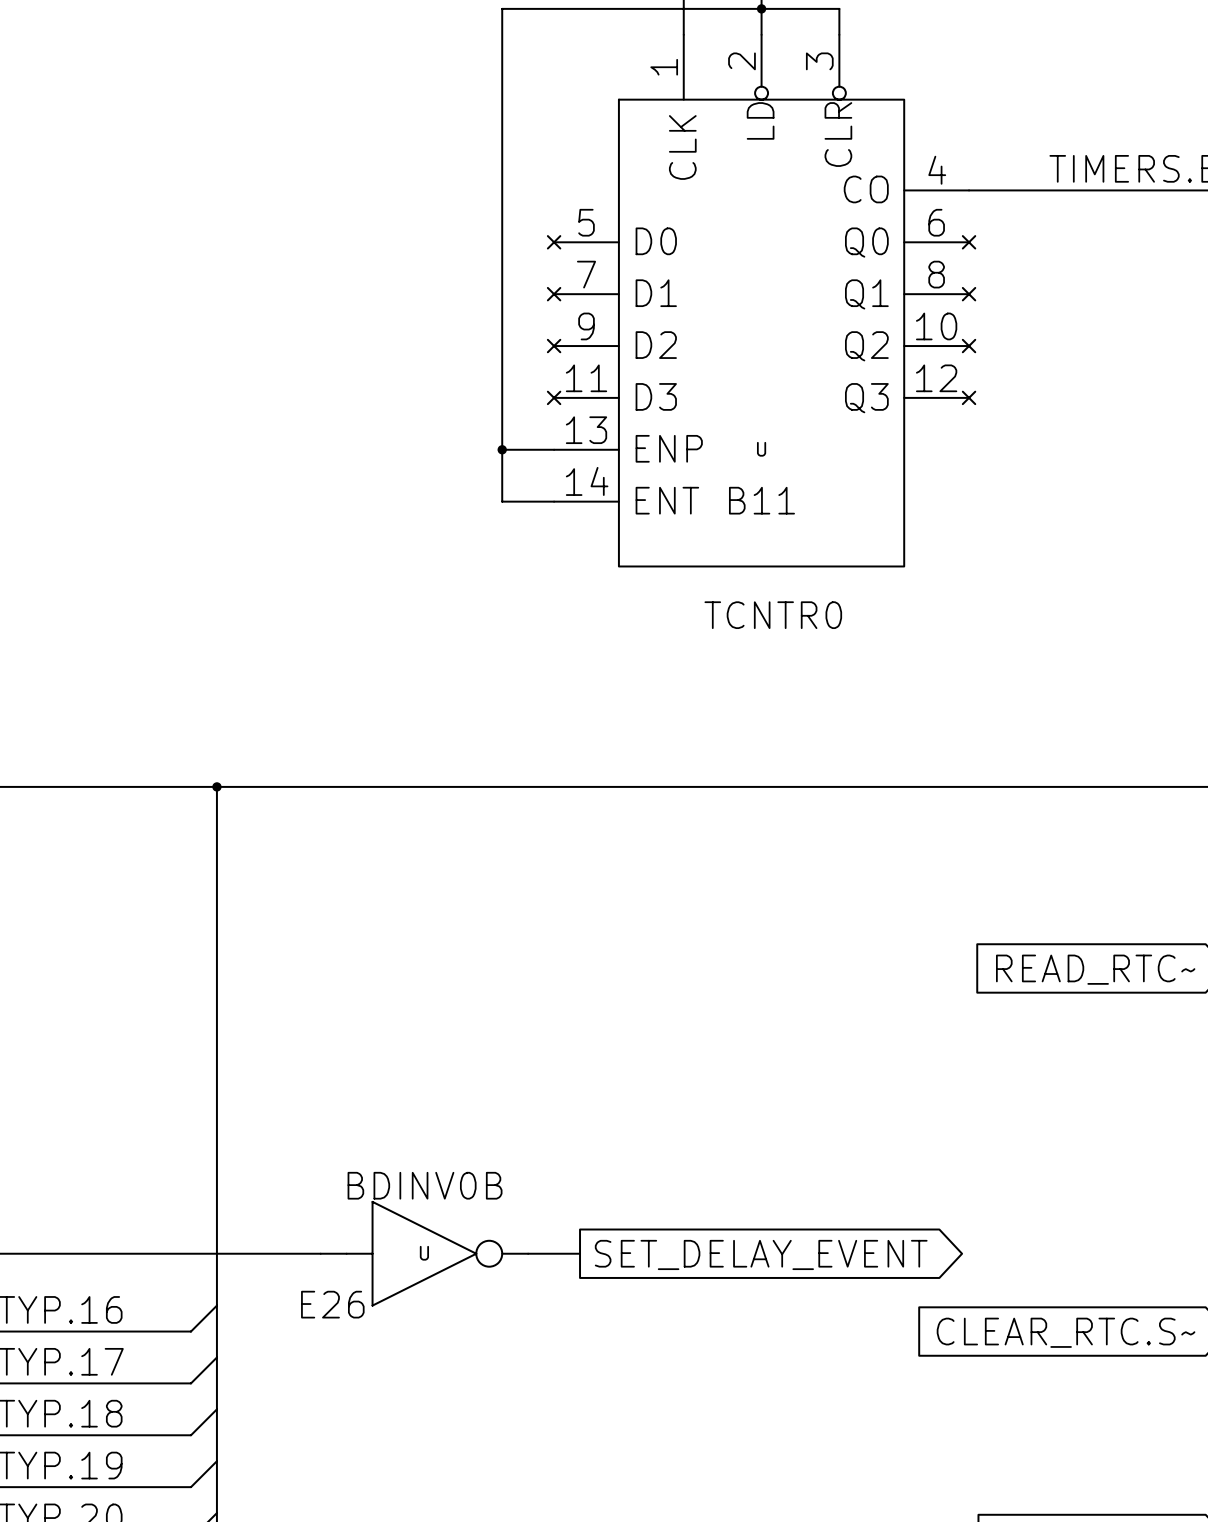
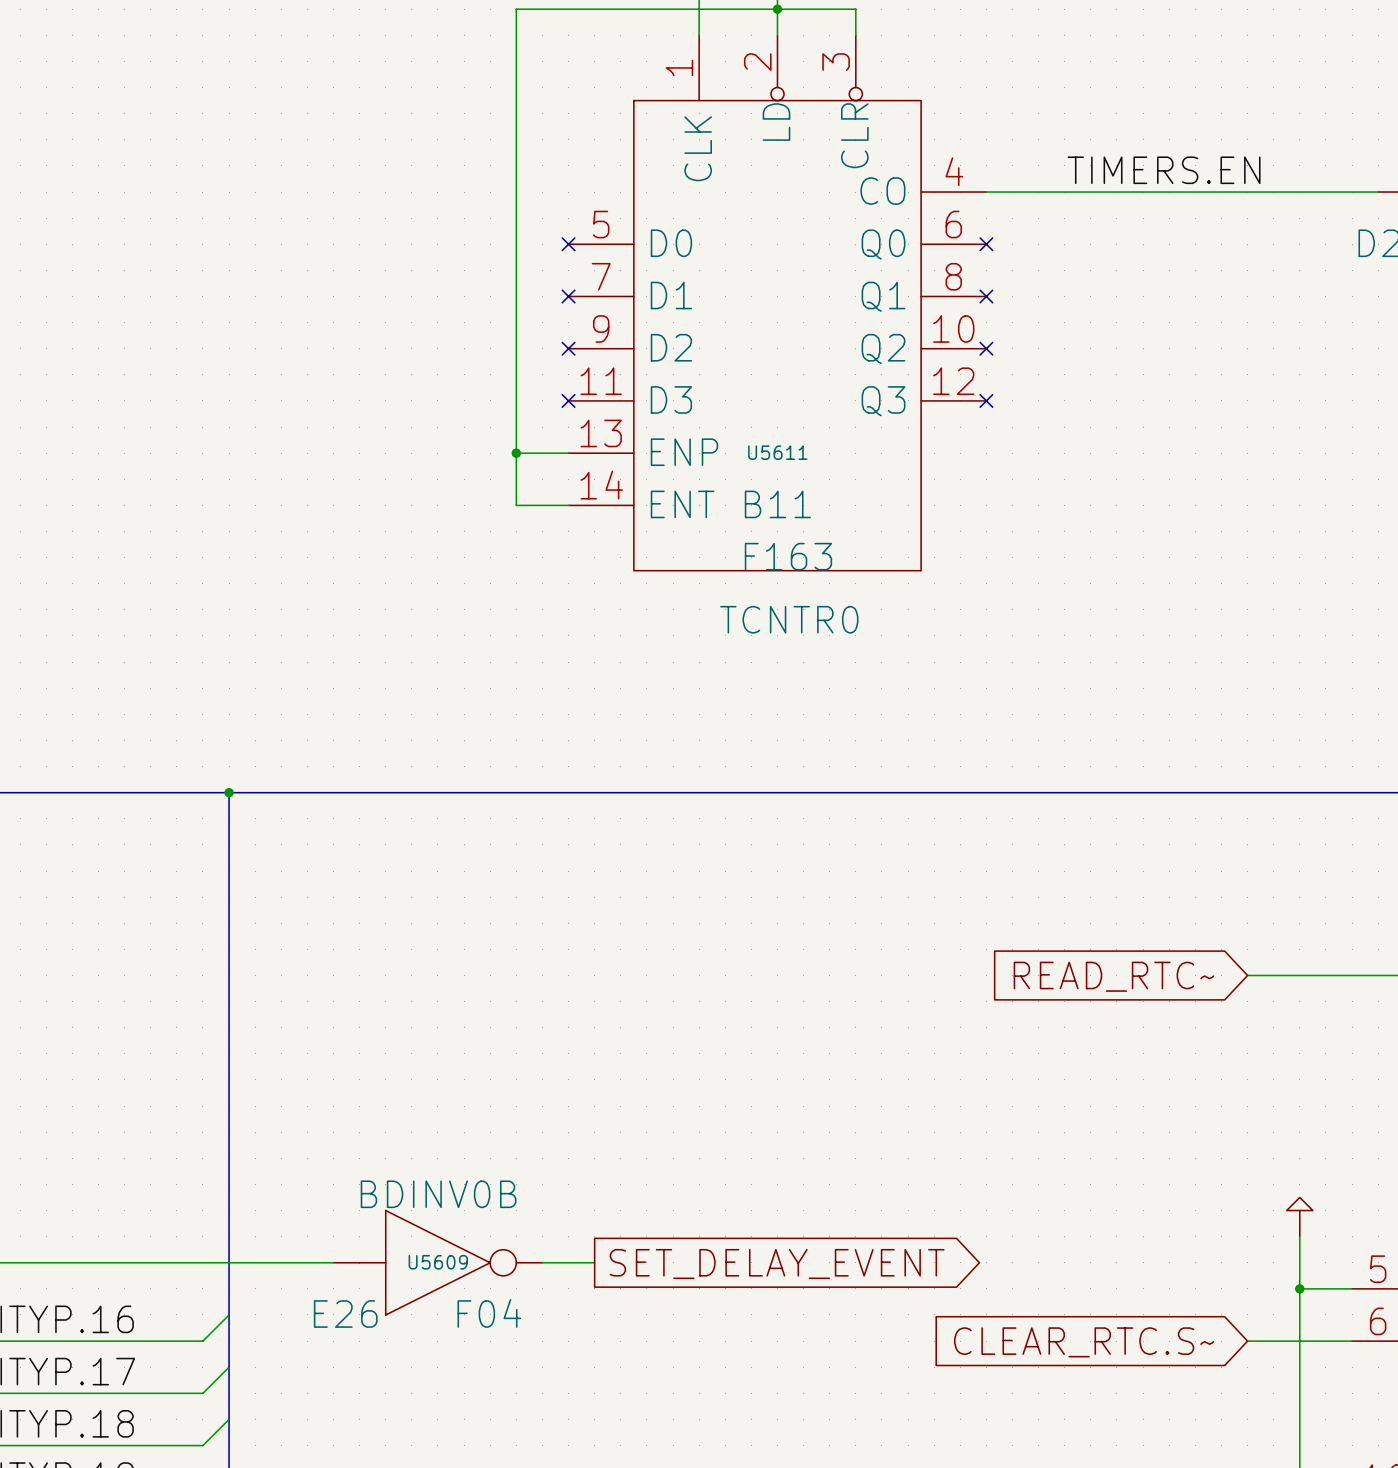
U name: U (761, 449) -> U5611 (777, 452)
U value: none -> F163 (788, 556)
U name: U (424, 1253) -> U5609 (438, 1262)
U value: none -> F04 (489, 1313)

